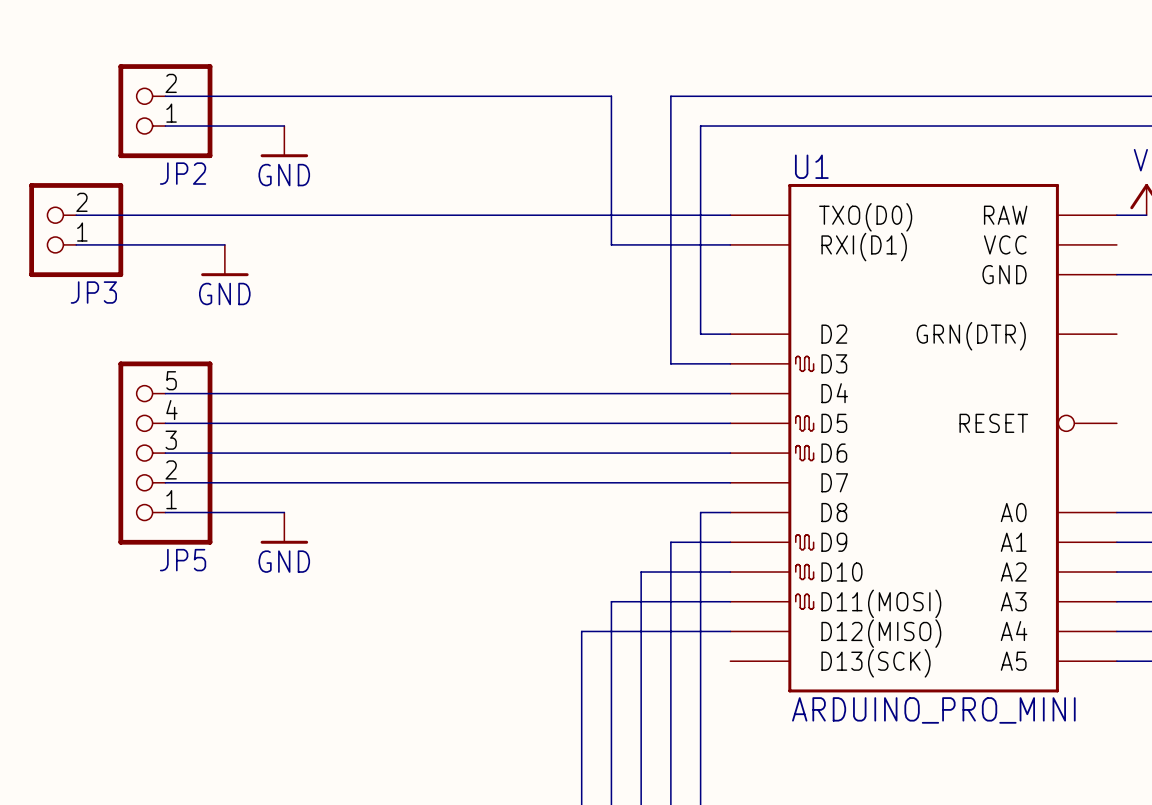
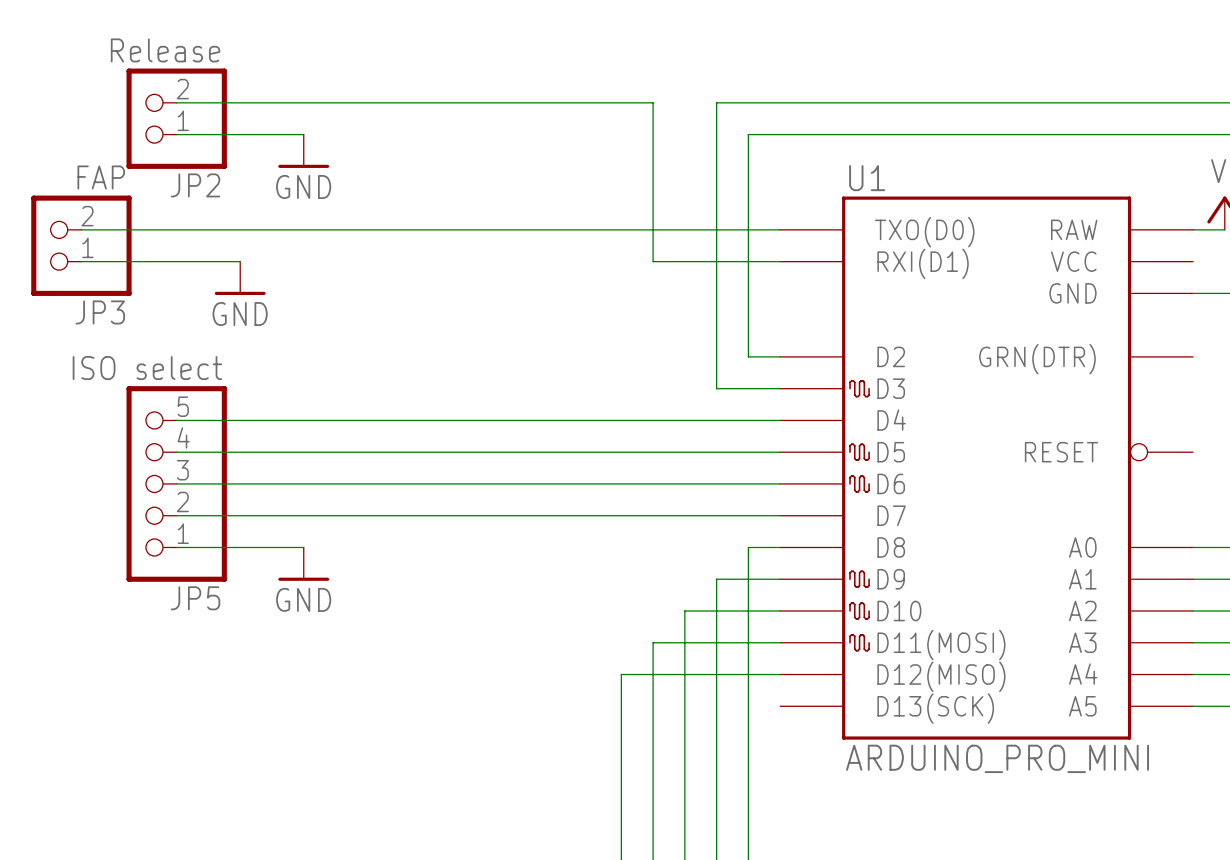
JP2 value: none -> Release (165, 50)
JP3 value: none -> FAP (101, 177)
JP5 value: none -> ISO select (147, 368)

